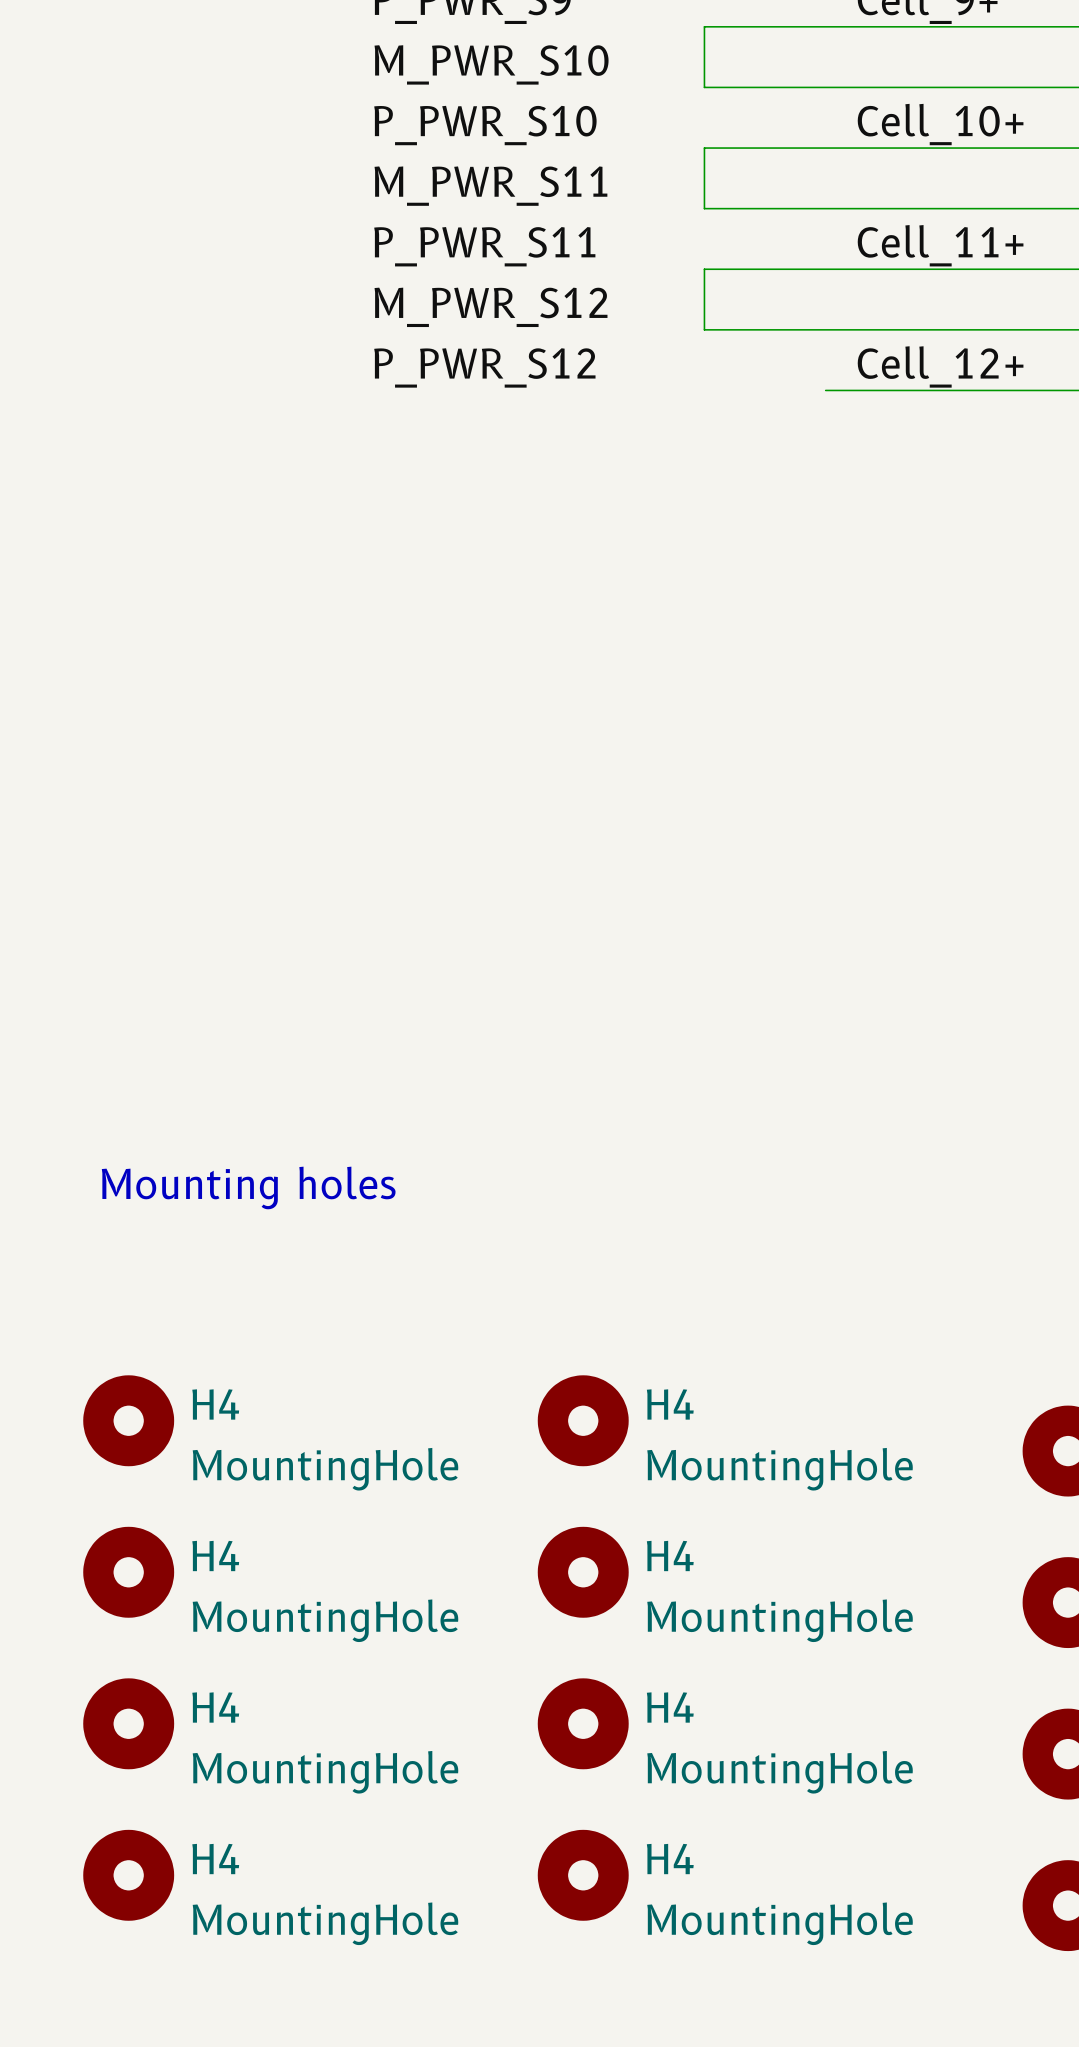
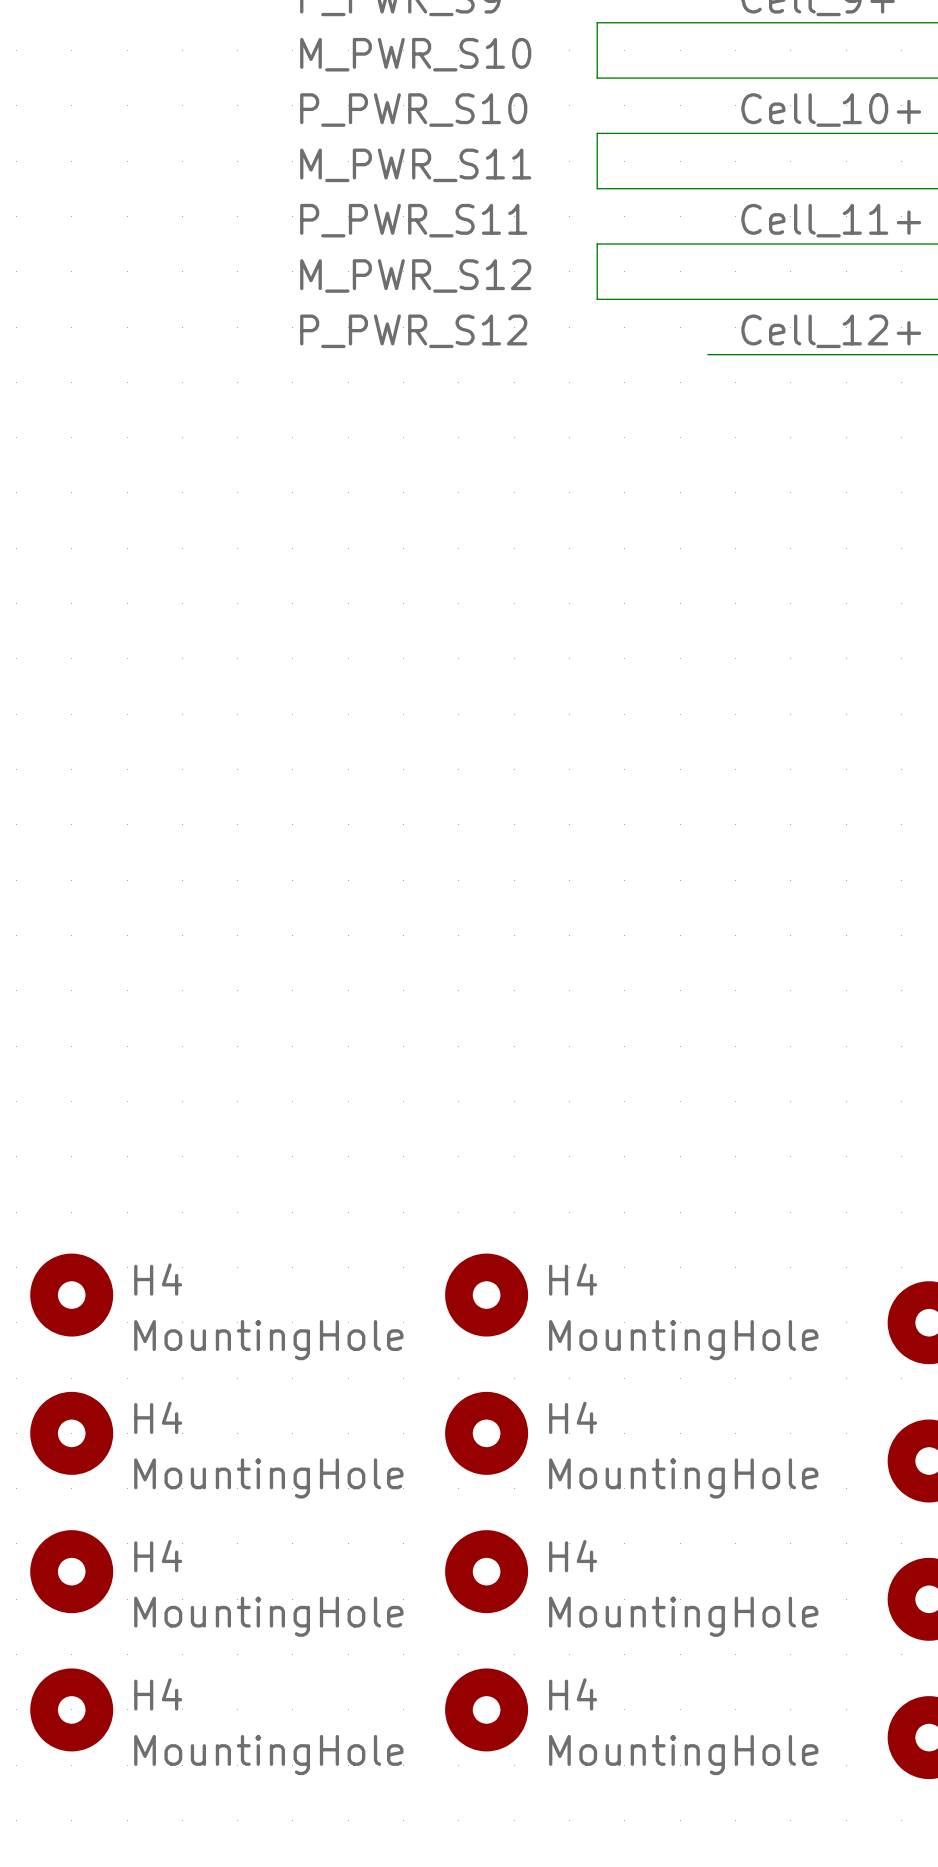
text: Mounting holes (248, 1187) -> none

